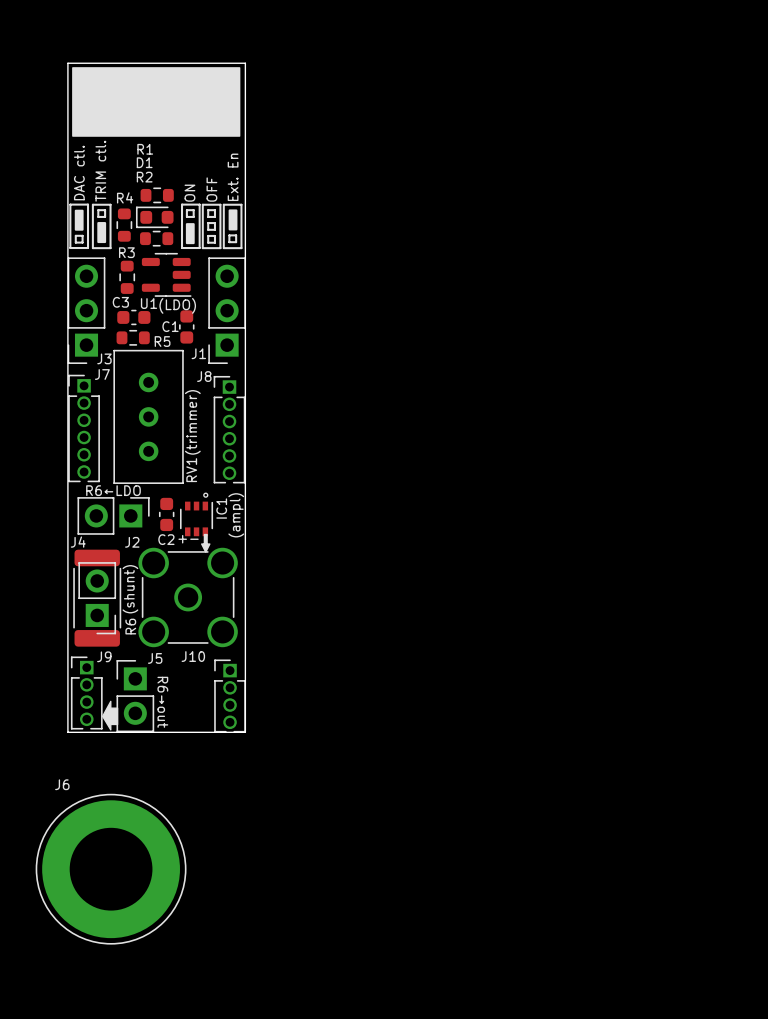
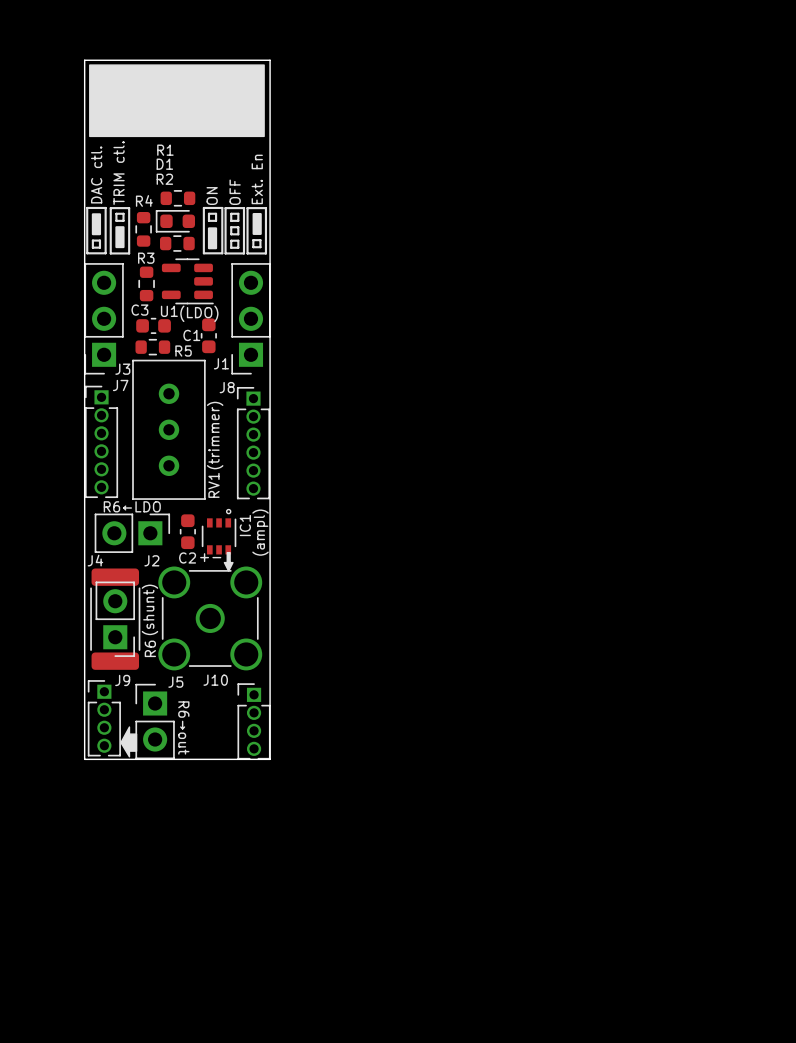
J6: (111, 869) -> none

